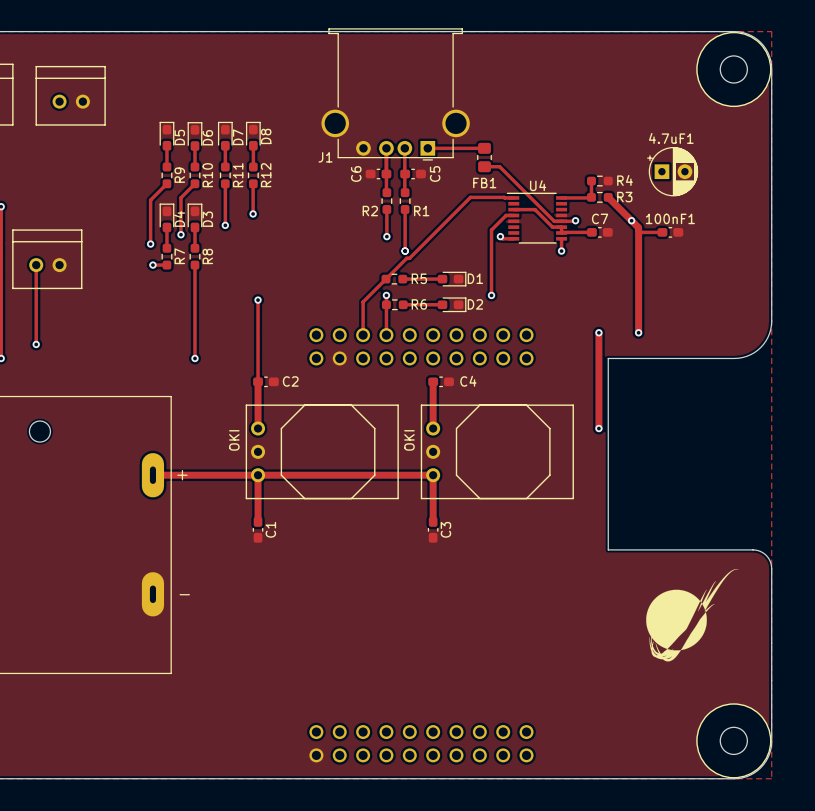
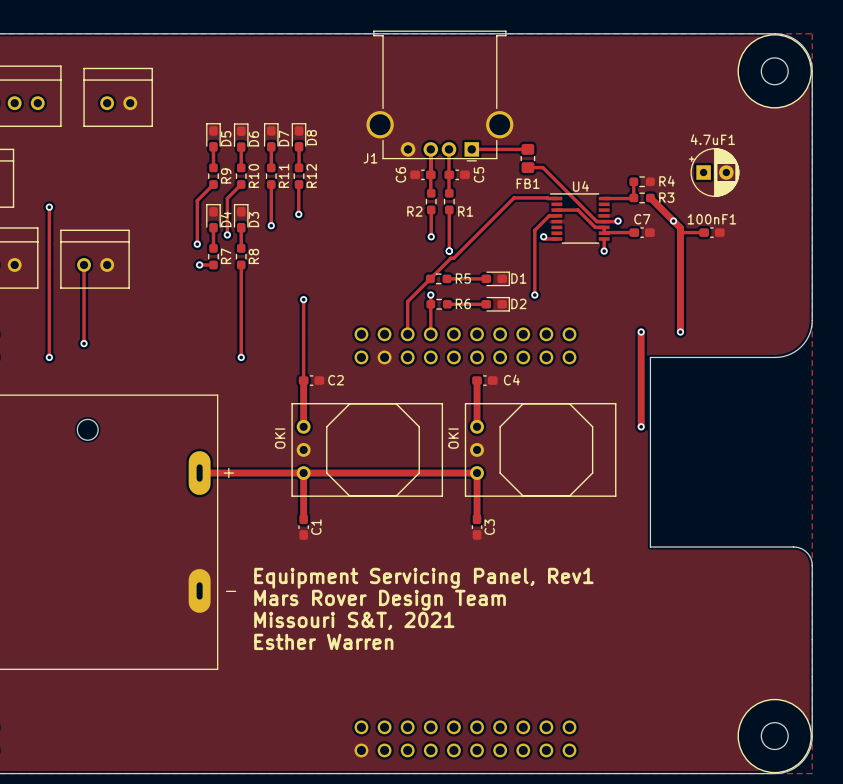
drawing: [646, 569, 739, 662] -> none
text: none -> Equipment Servicing Panel, Rev1 (423, 578)
text: none -> Mars Rover Design Team (380, 600)
text: none -> Missouri S&T, 2021 (354, 620)
text: none -> Esther Warren (323, 641)

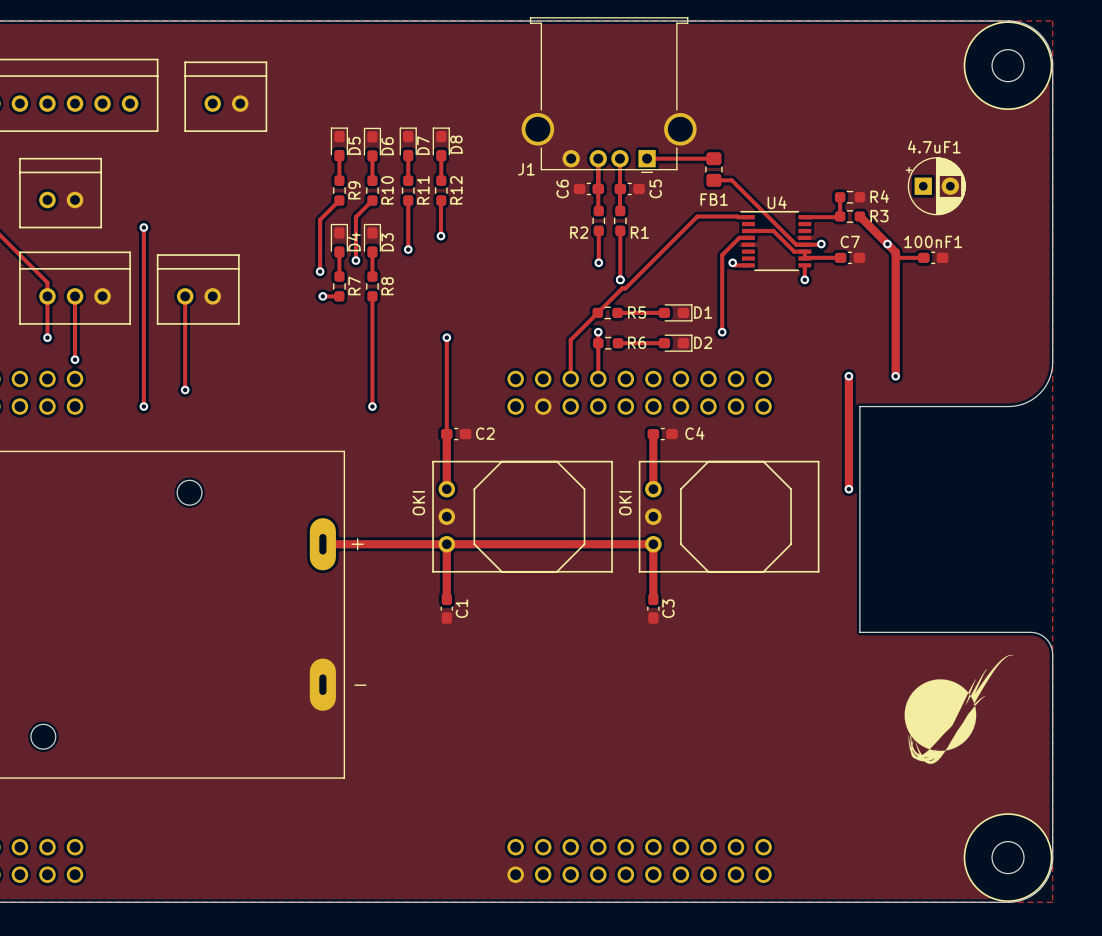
drawing: none -> [904, 655, 1014, 764]
text: Equipment Servicing Panel, Rev1 (423, 578) -> none
text: Mars Rover Design Team (380, 600) -> none
text: Missouri S&T, 2021 (354, 620) -> none
text: Esther Warren (323, 641) -> none

